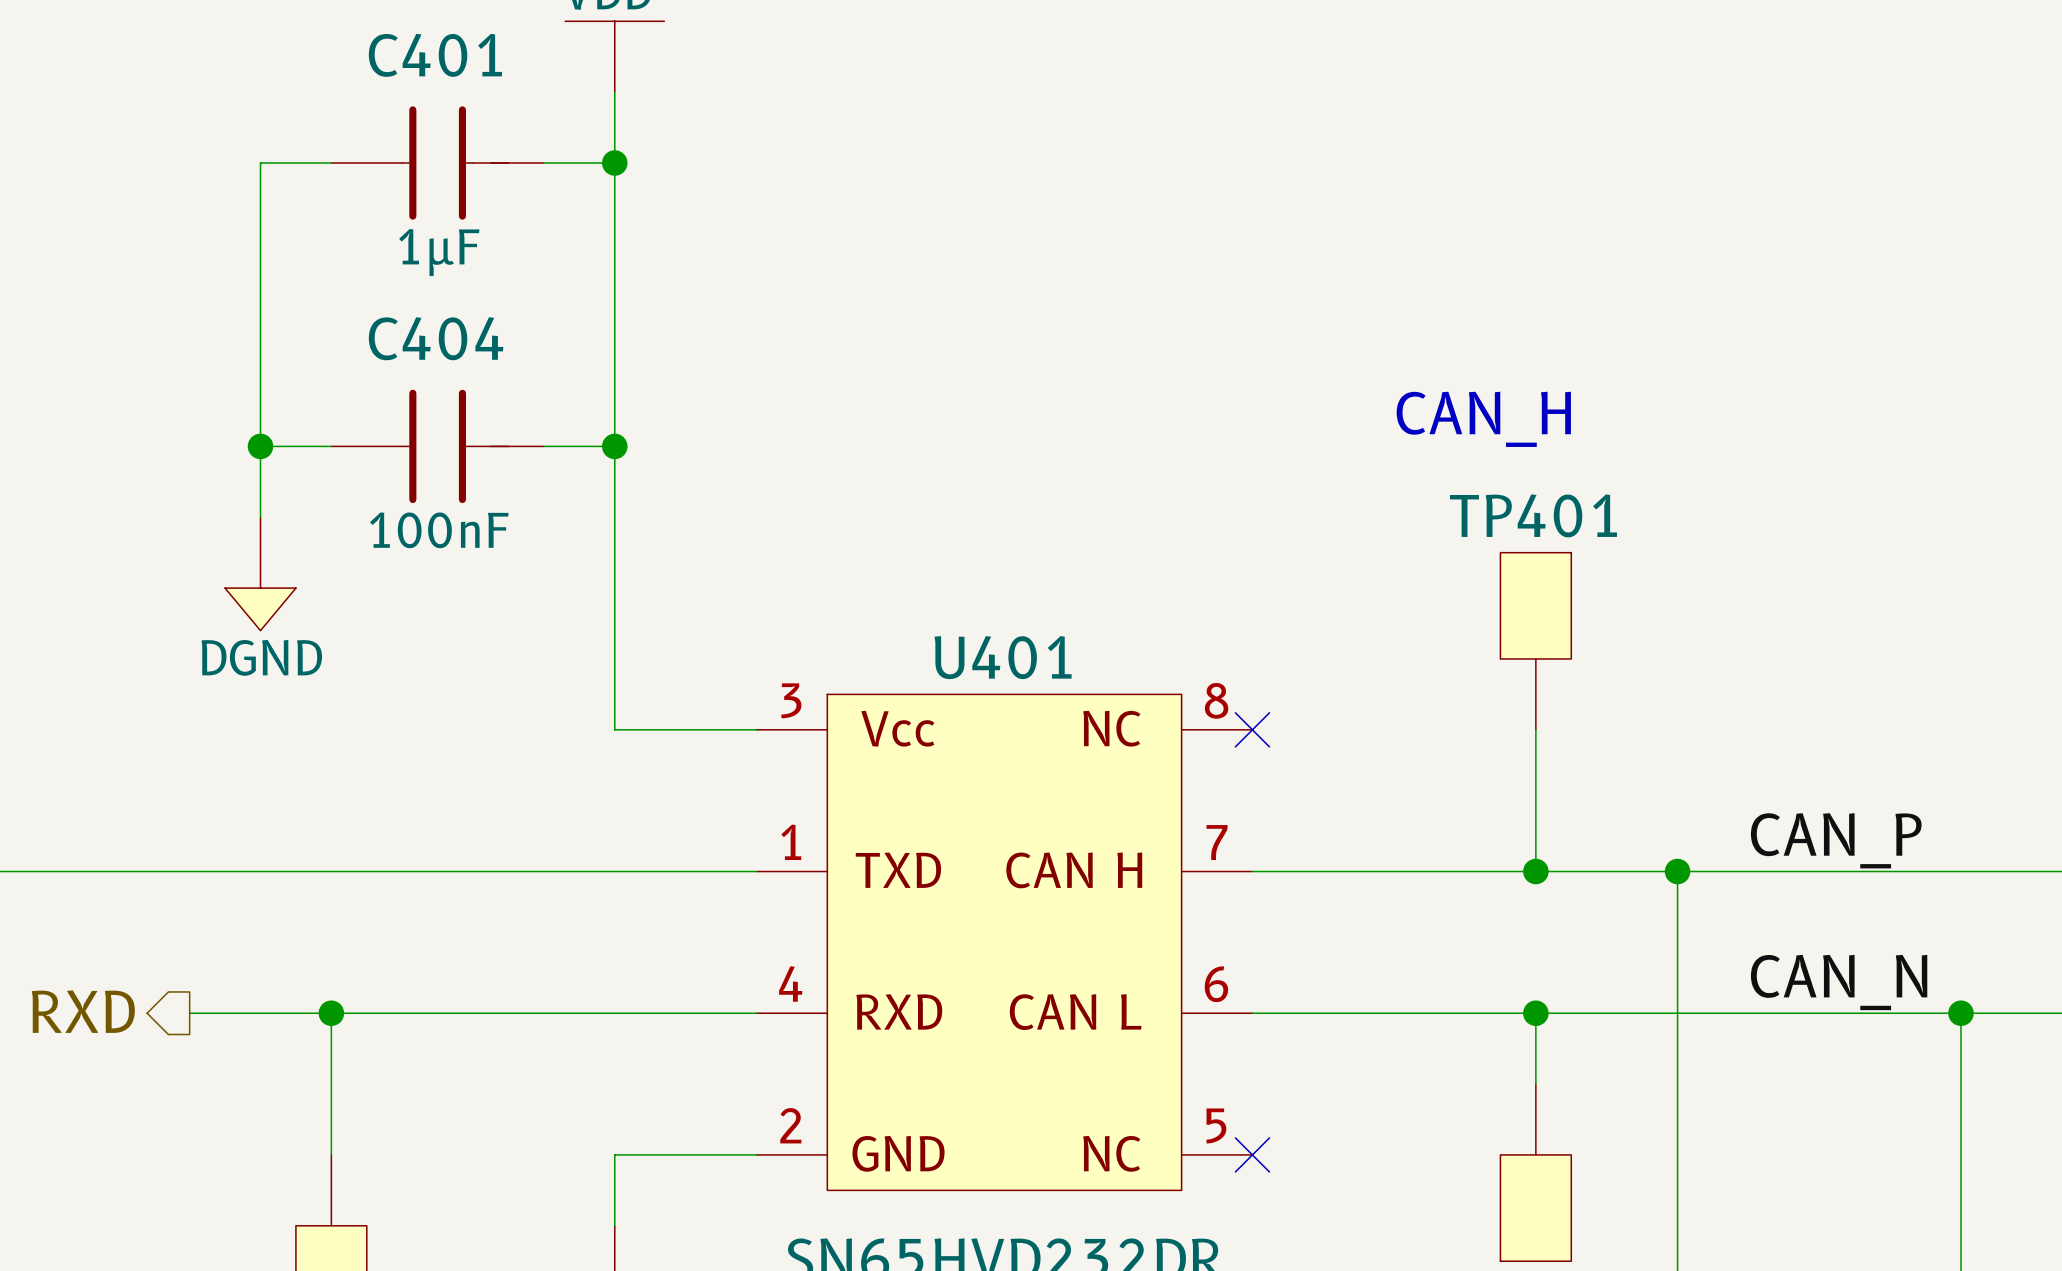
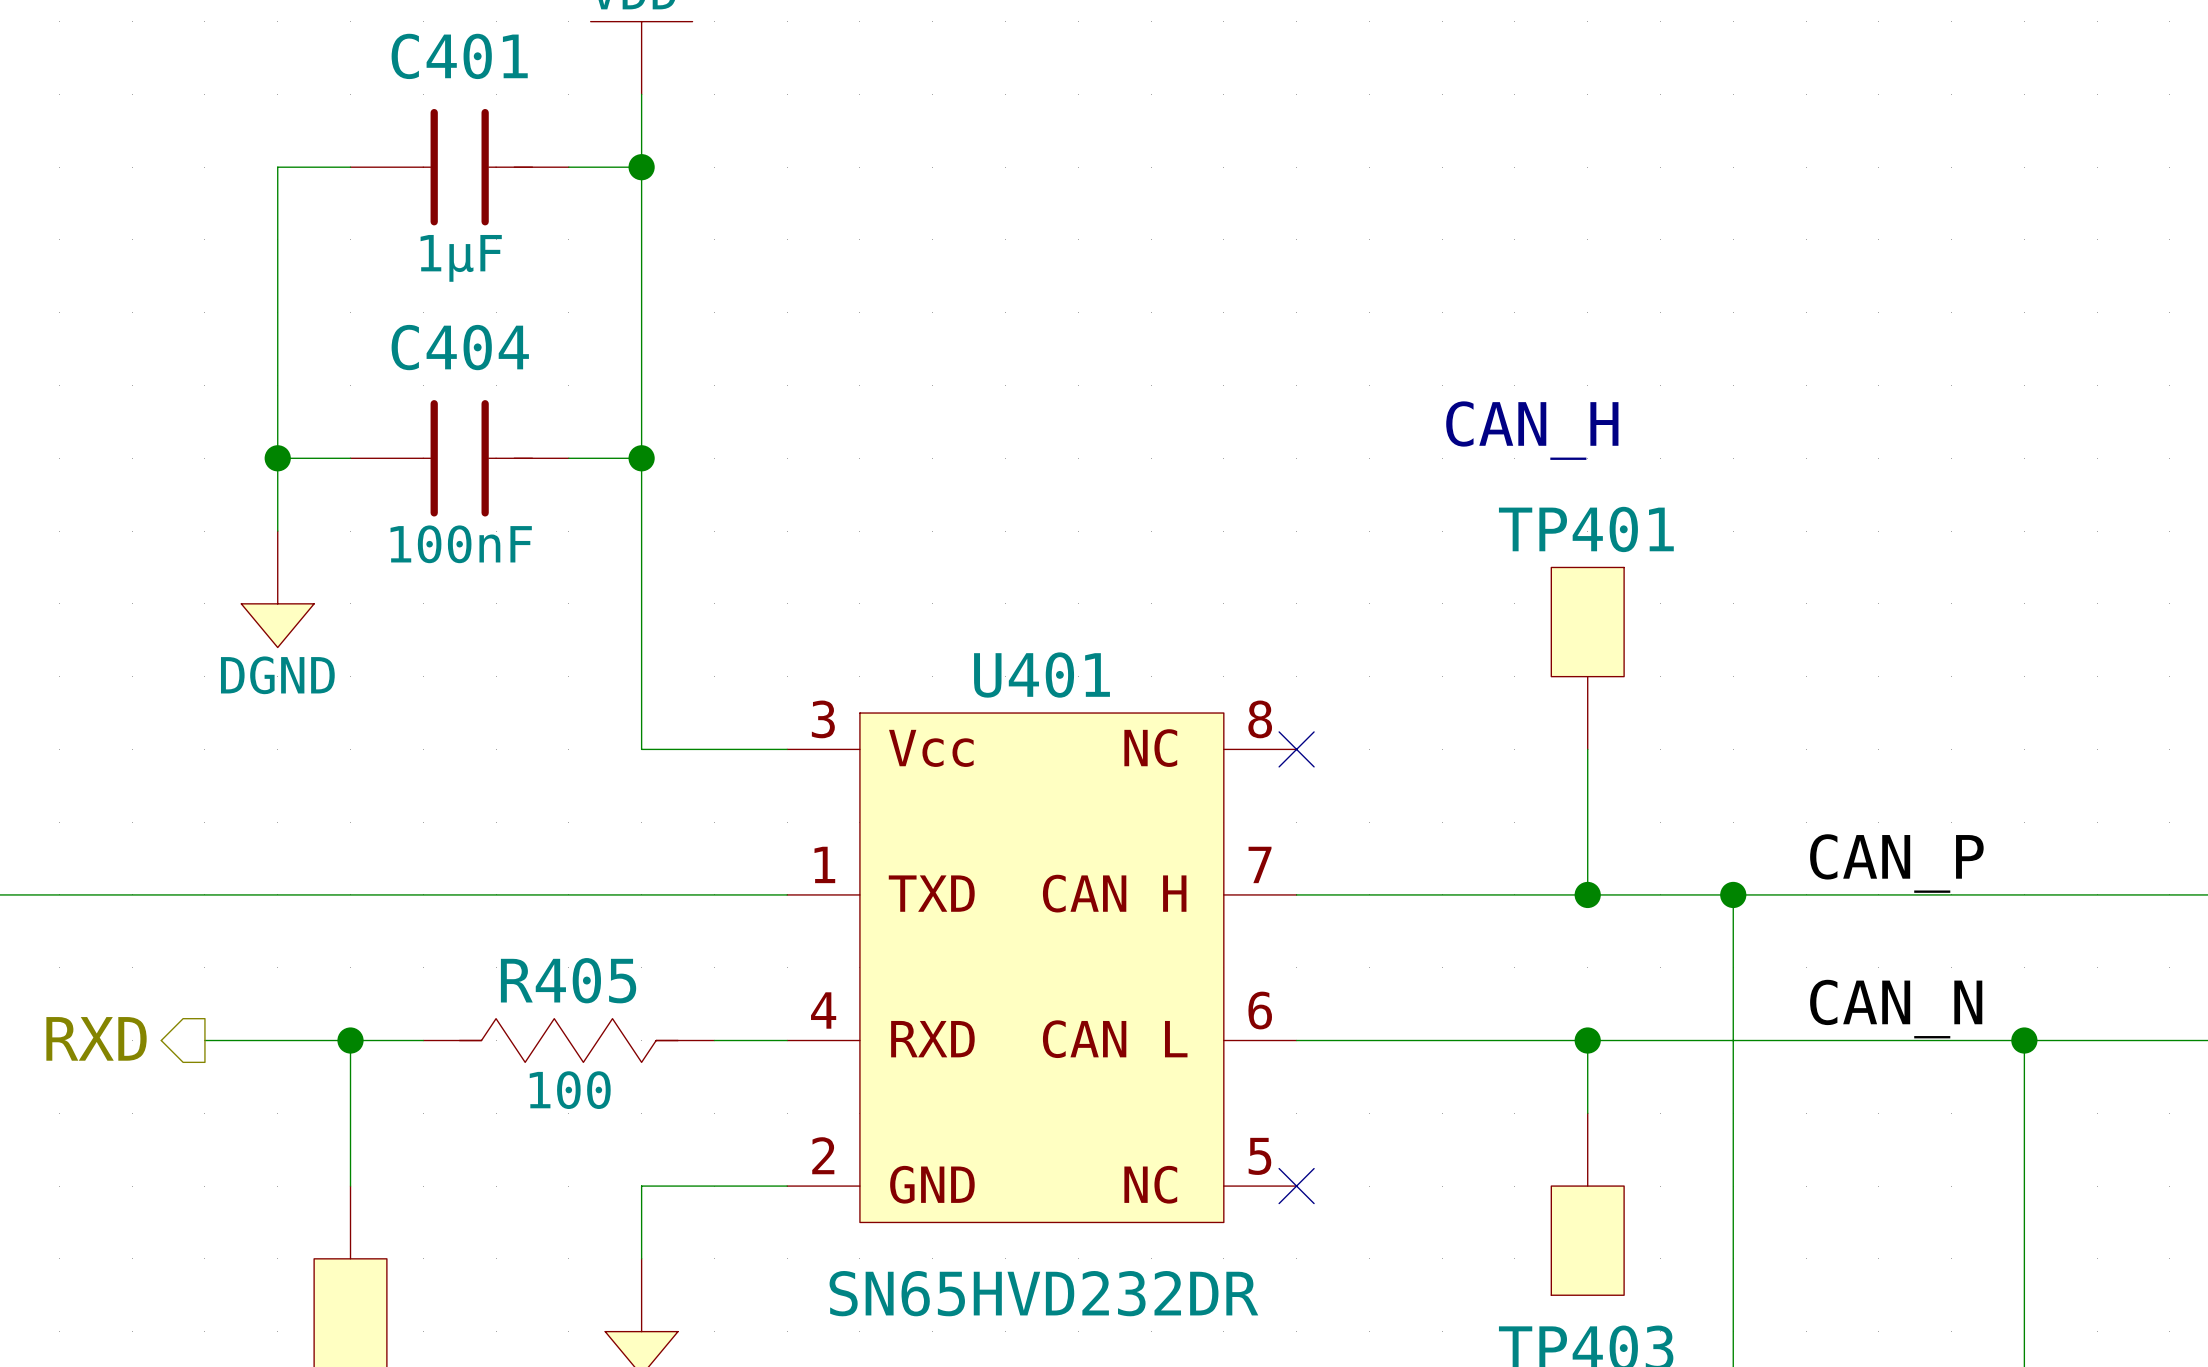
wire: (402, 1013) (685, 1013) -> none
R405: none -> (568, 1040)

